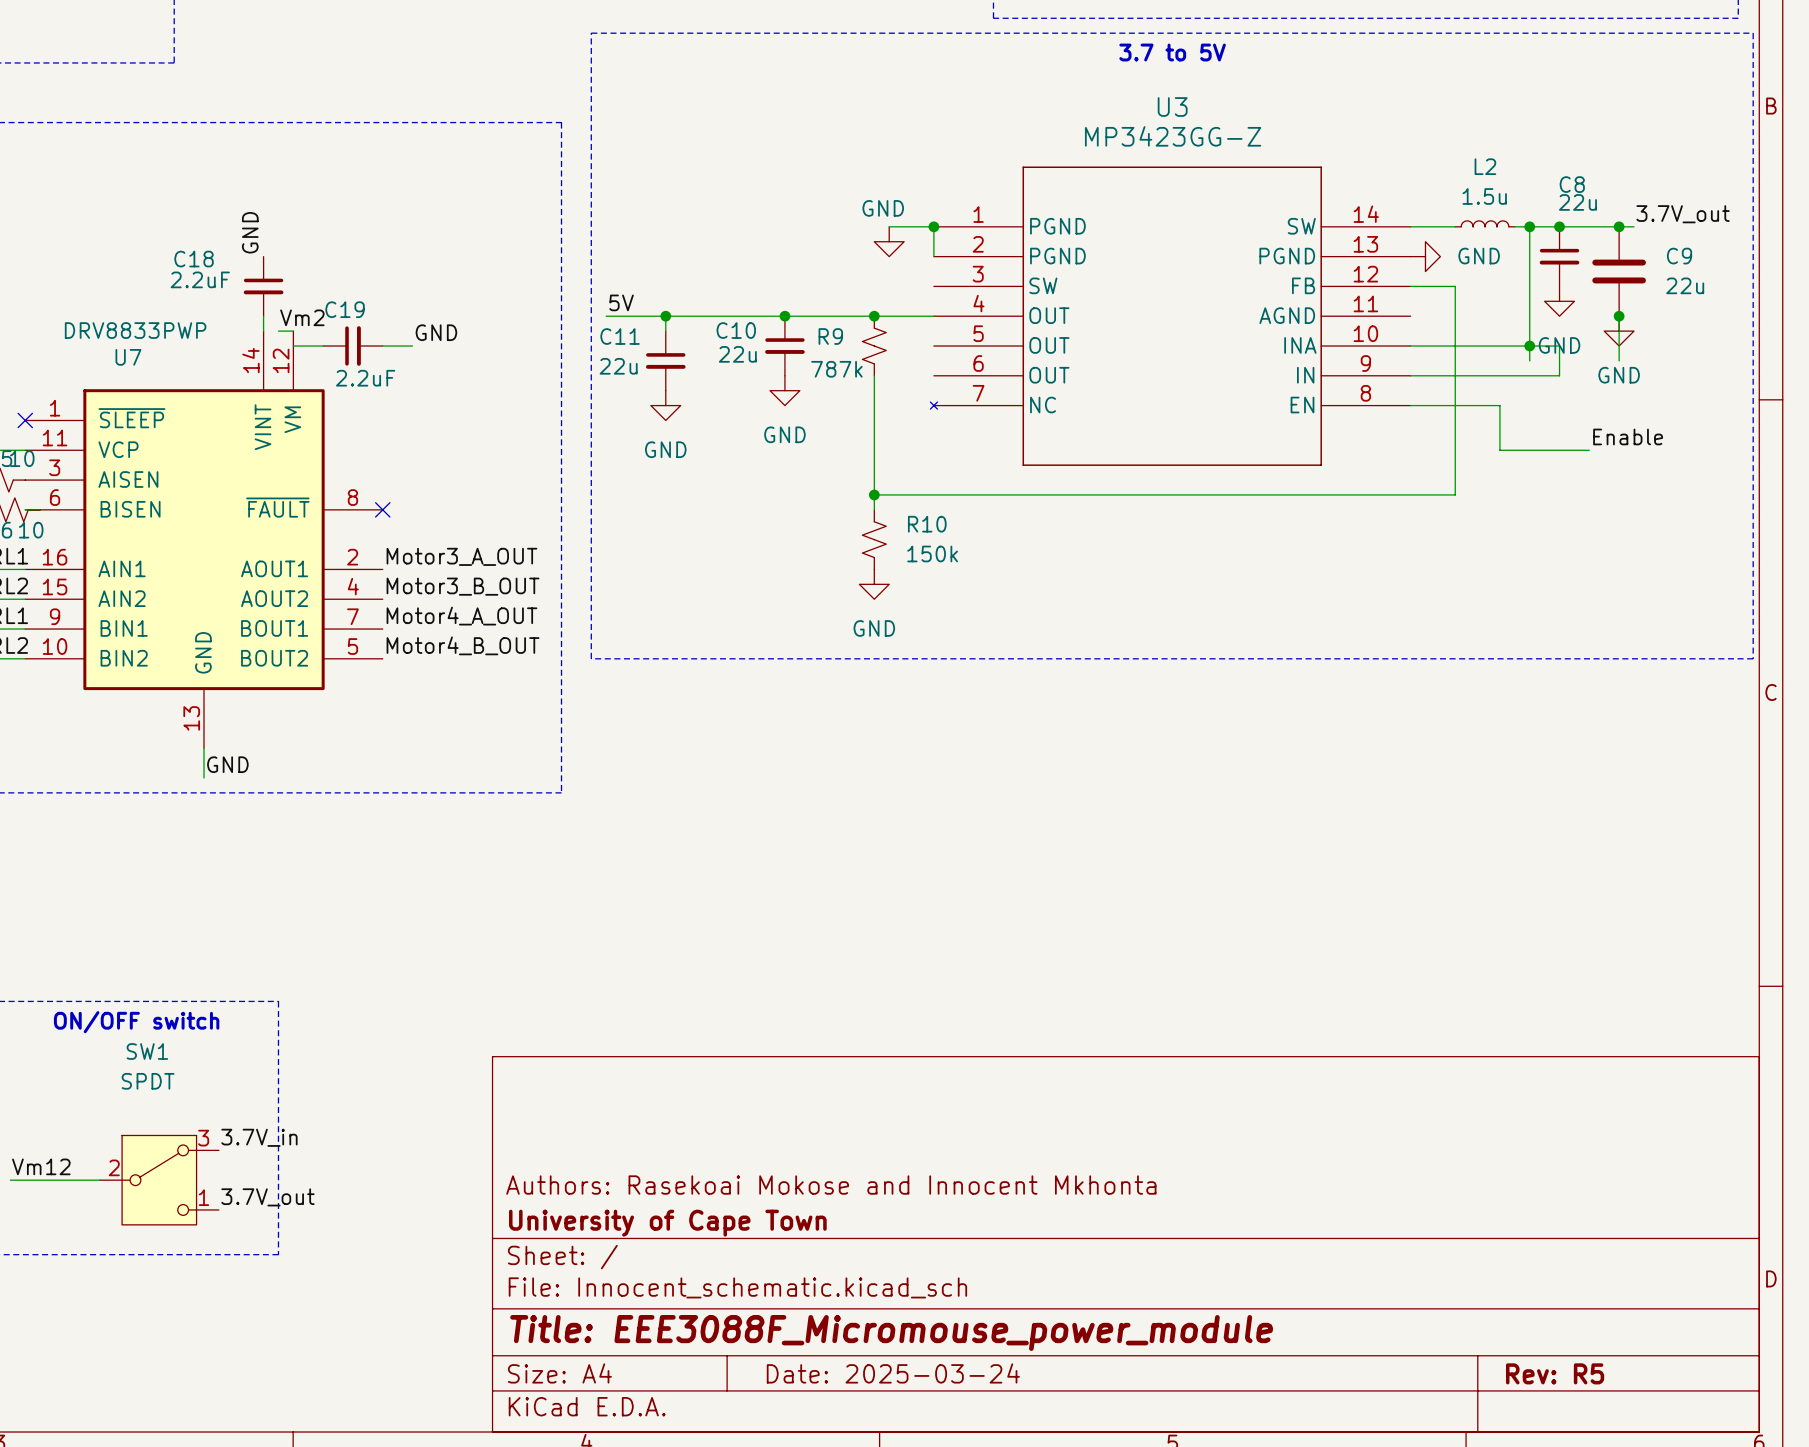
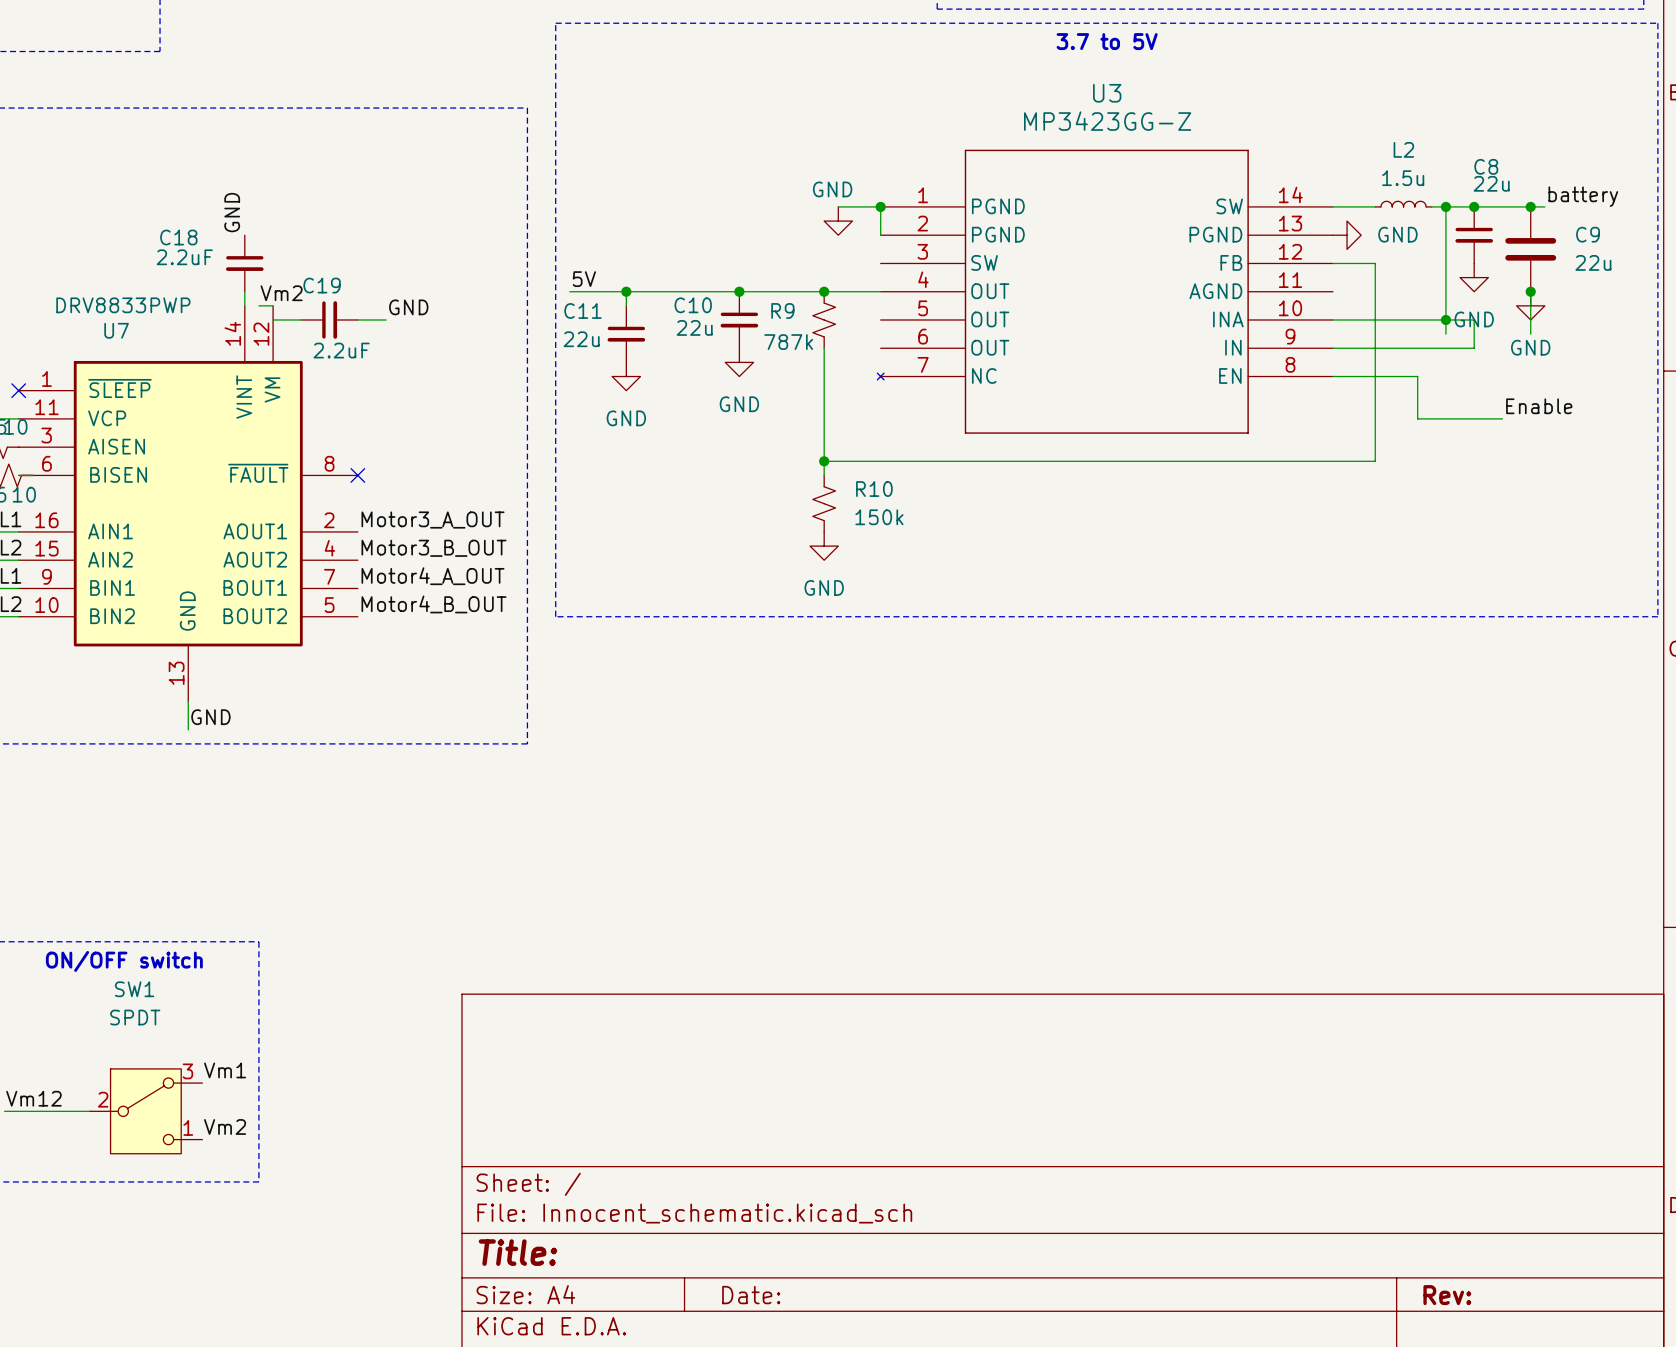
label: 3.7V_out (1683, 214) -> battery (1583, 196)
label: 3.7V_in (259, 1137) -> Vm1 (225, 1070)
title block: Authors: Rasekoai Mokose and Innocent Mkhonta (831, 1185) -> none
label: 3.7V_out (267, 1197) -> Vm2 (225, 1126)
title block: University of Cape Town (667, 1223) -> none
title block: Title: EEE3088F_Micromouse_power_module (891, 1332) -> Title: (517, 1252)
title block: Date: 2025-03-24 (893, 1373) -> Date: (751, 1295)
title block: Rev: R5 (1555, 1373) -> Rev: (1447, 1295)

